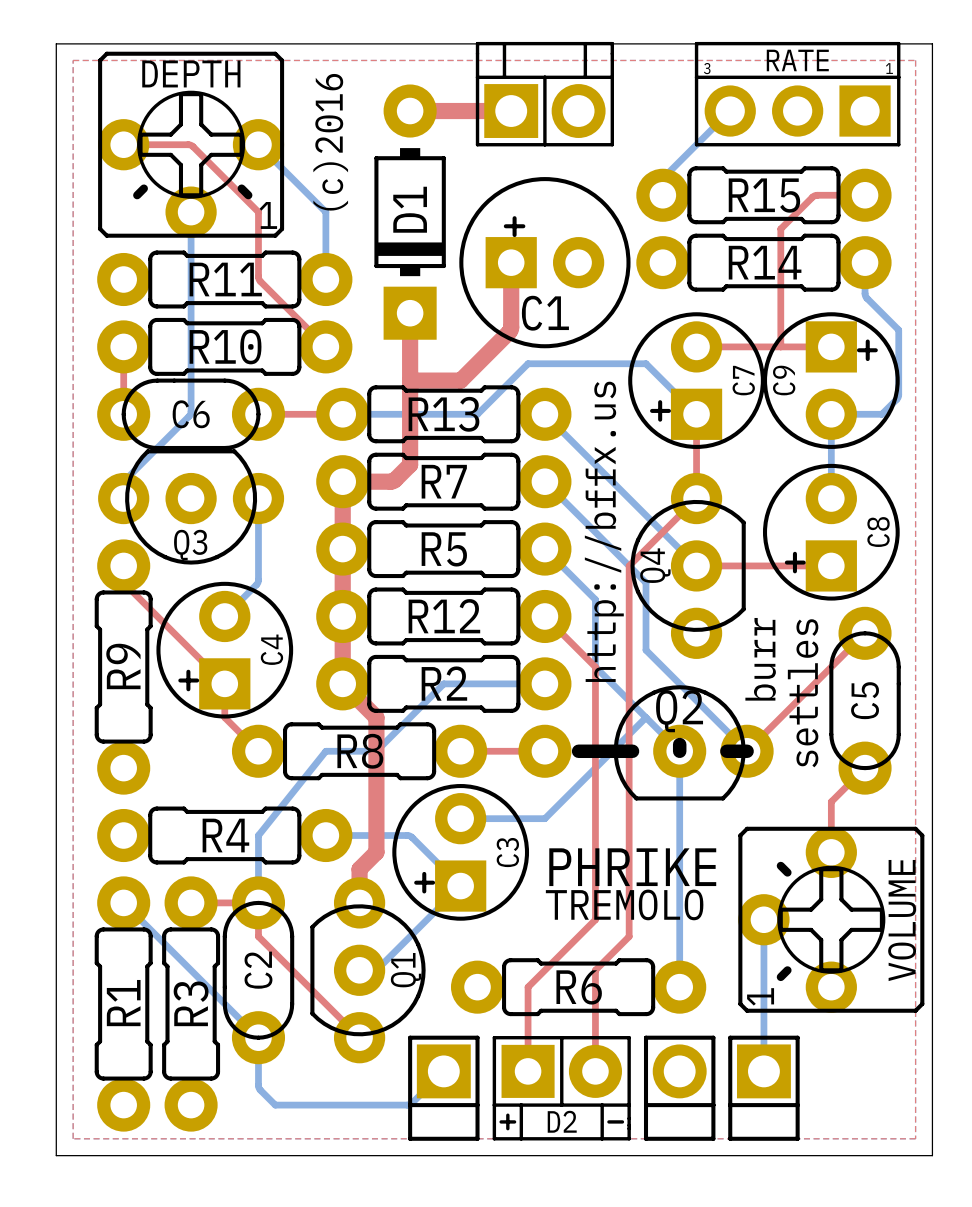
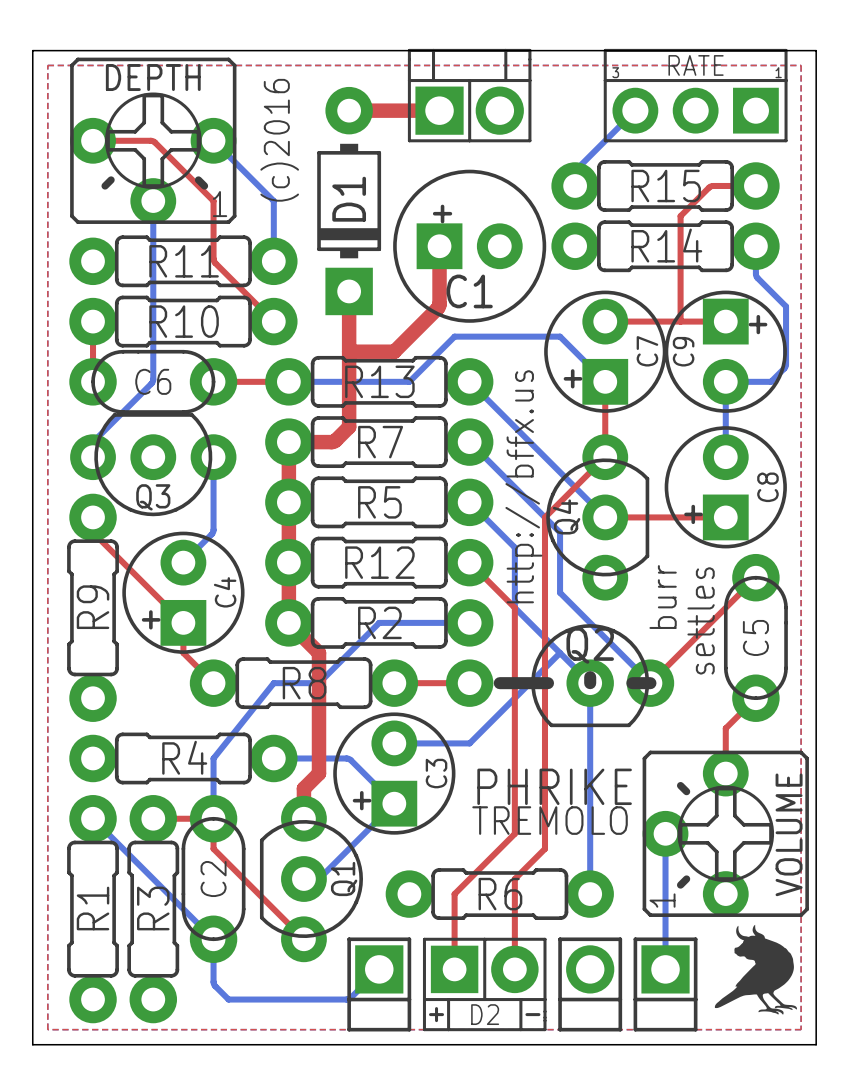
drawing: none -> [714, 924, 797, 1015]

